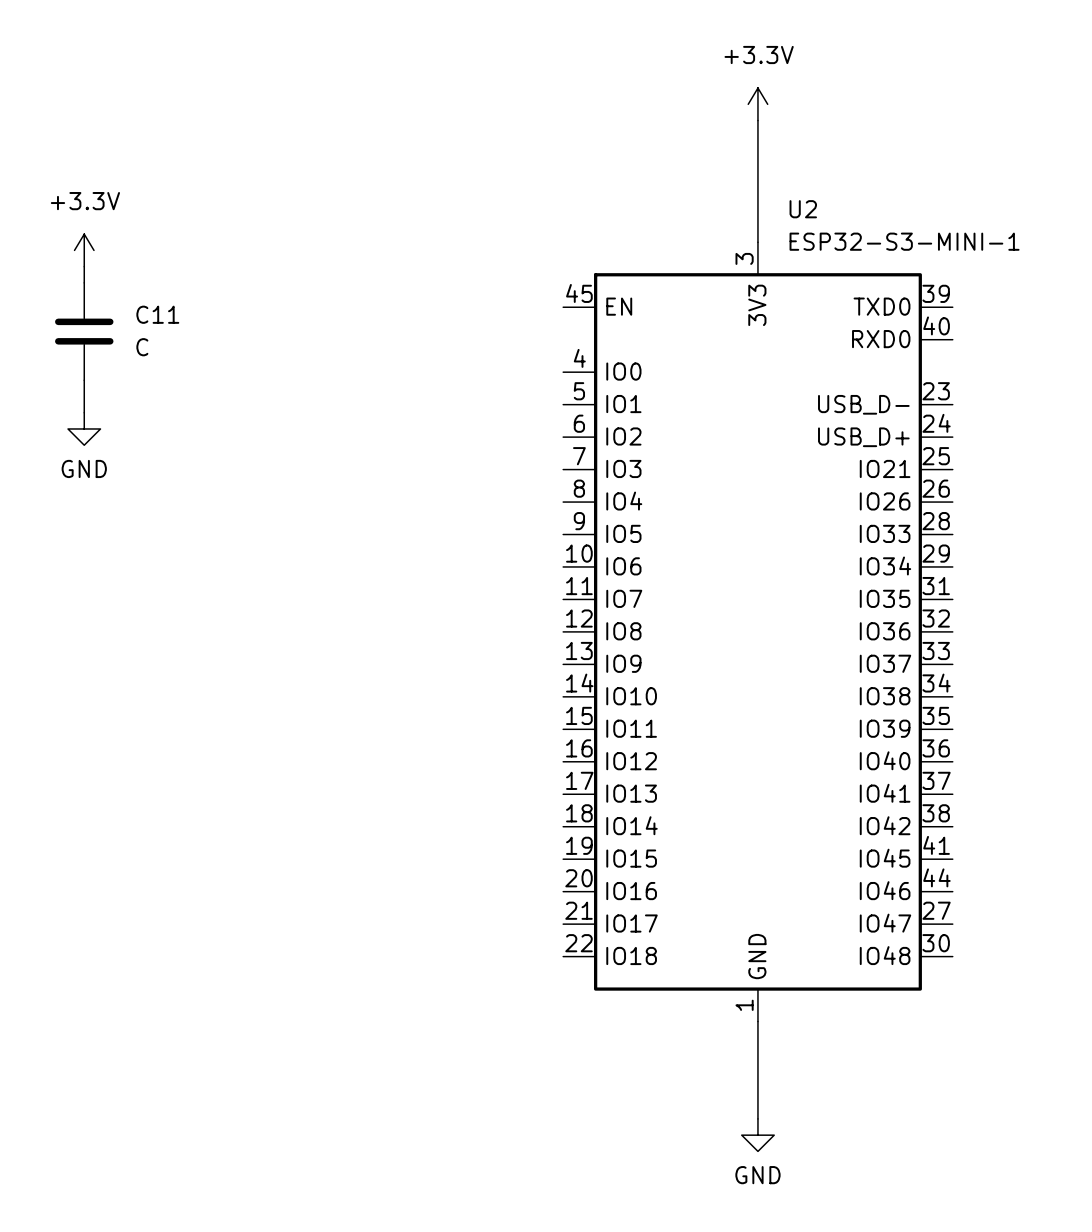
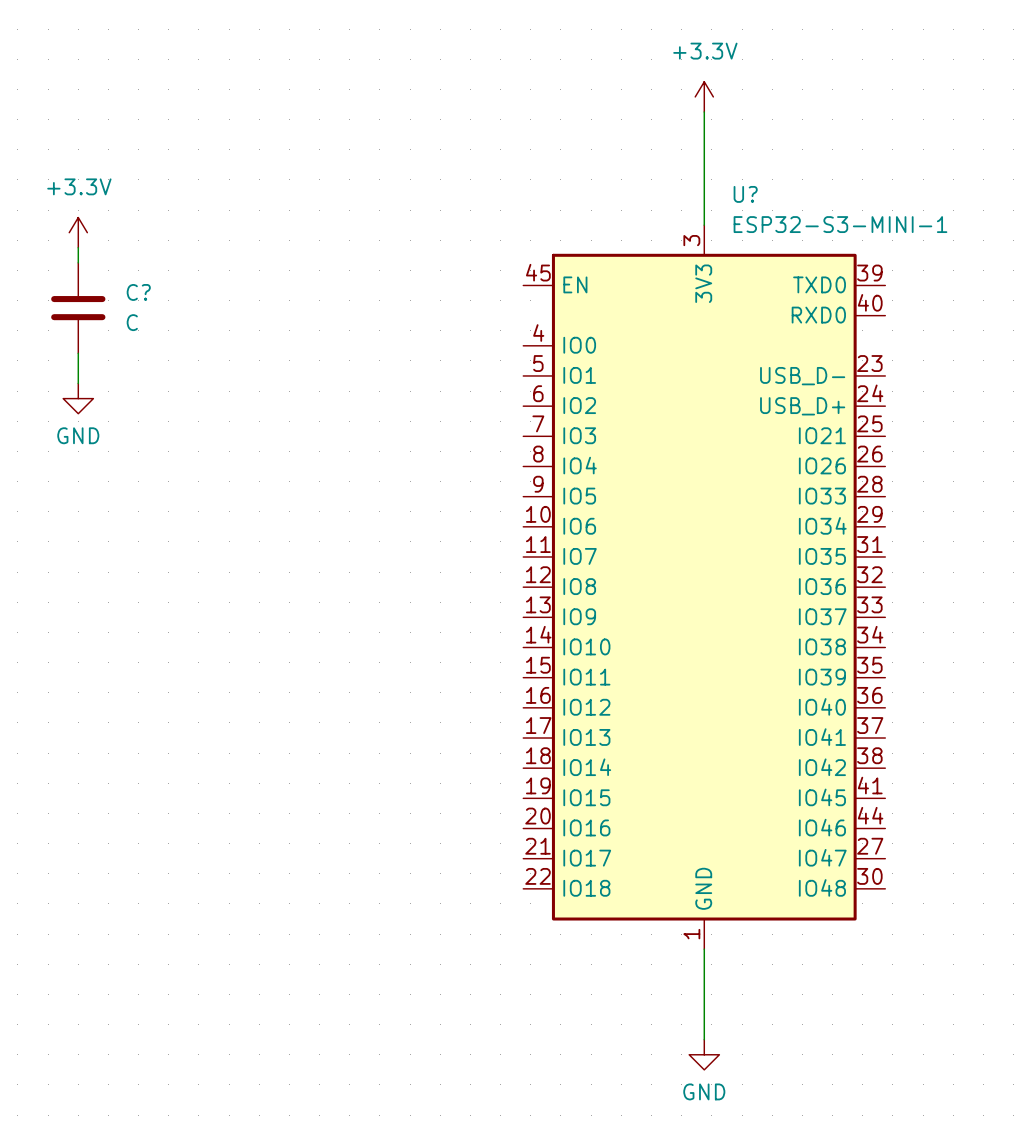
U2 name: U2 (803, 209) -> U? (745, 194)
C11 name: C11 (157, 314) -> C? (138, 292)

